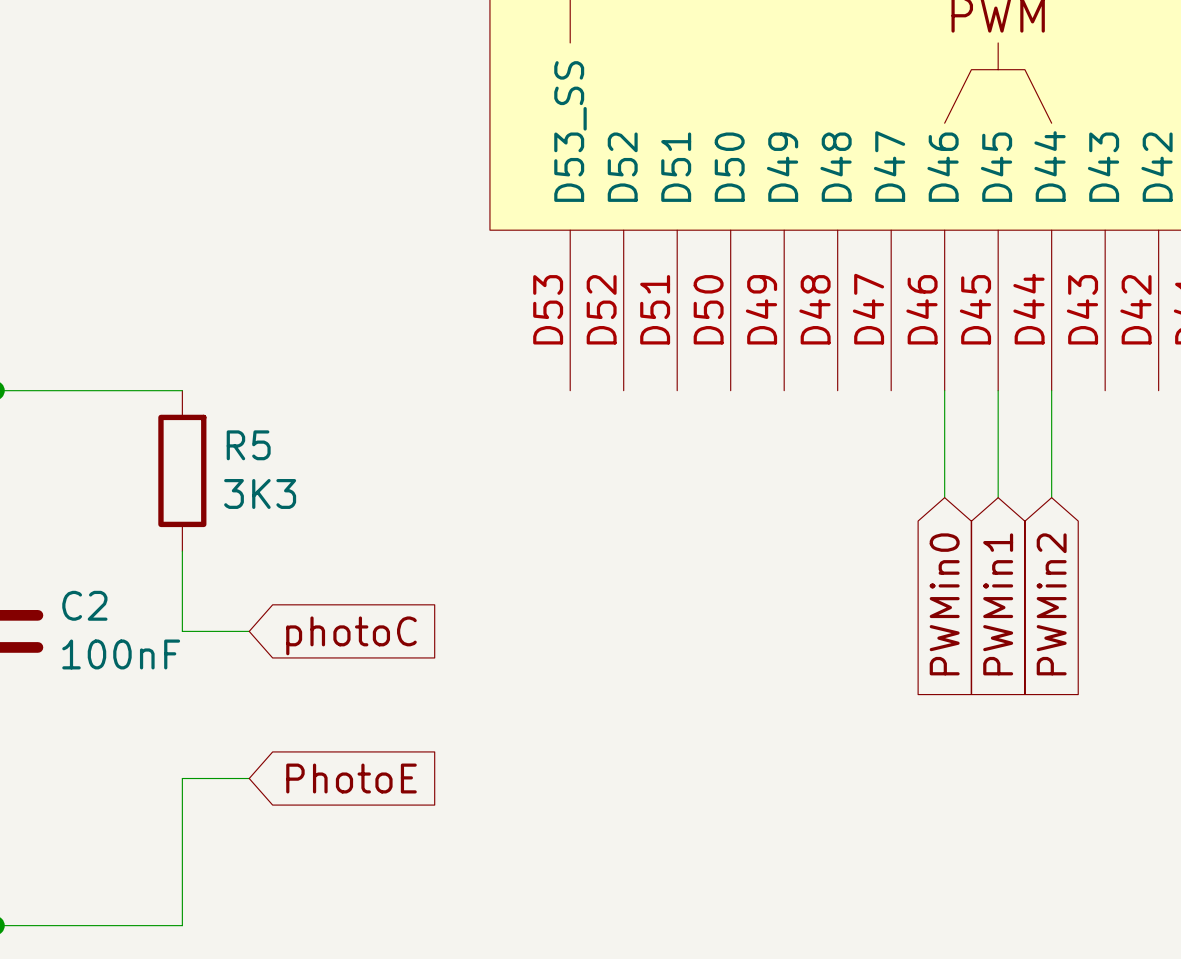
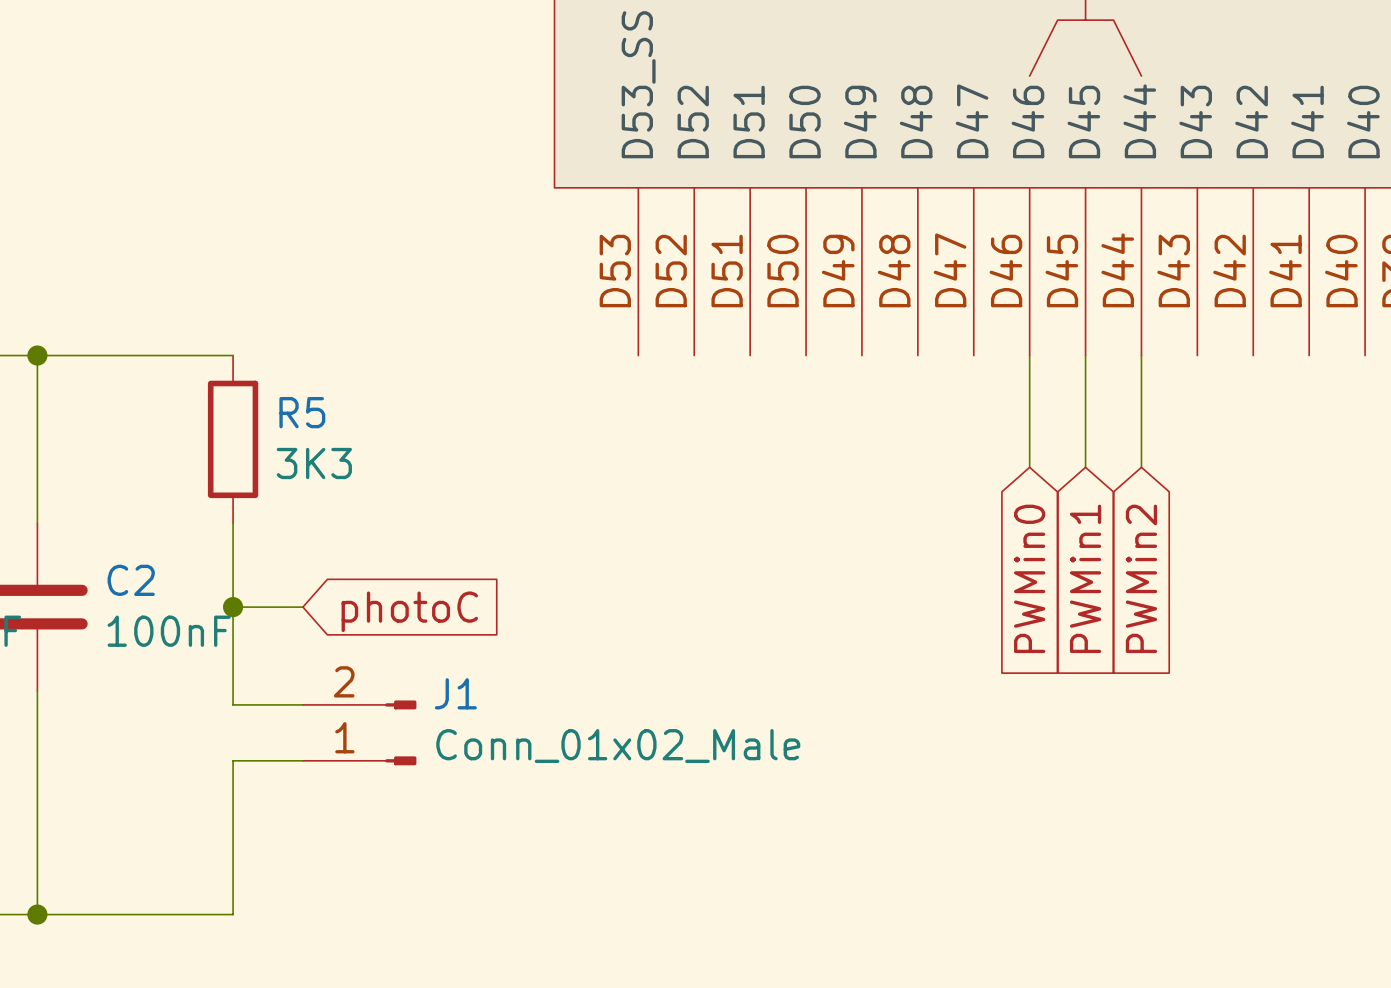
wire: none -> (233, 607) (233, 704) (302, 704)
junction: none -> (233, 607)
J1: none -> Conn_01x02_Male (359, 732)
global label: PhotoE (351, 778) -> none

